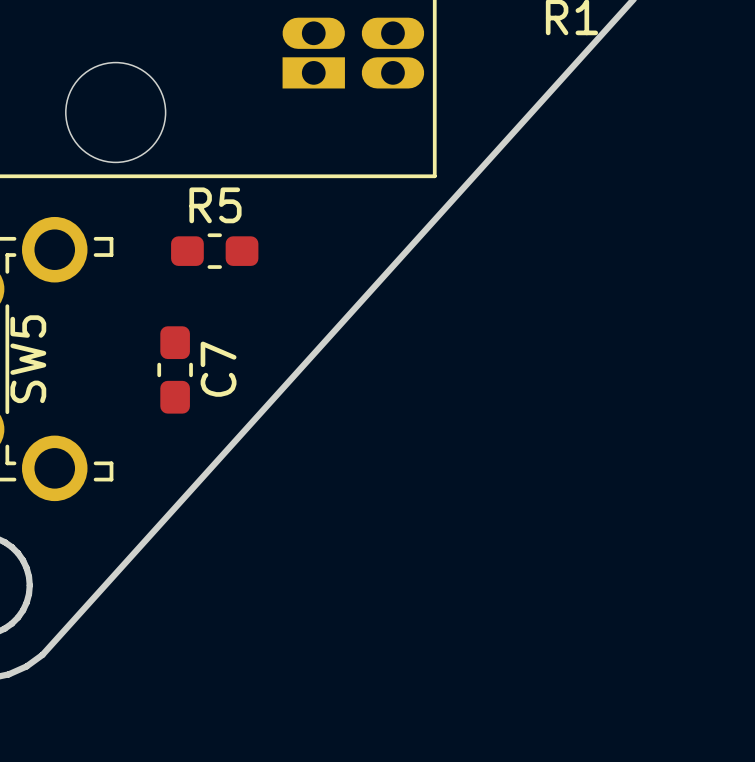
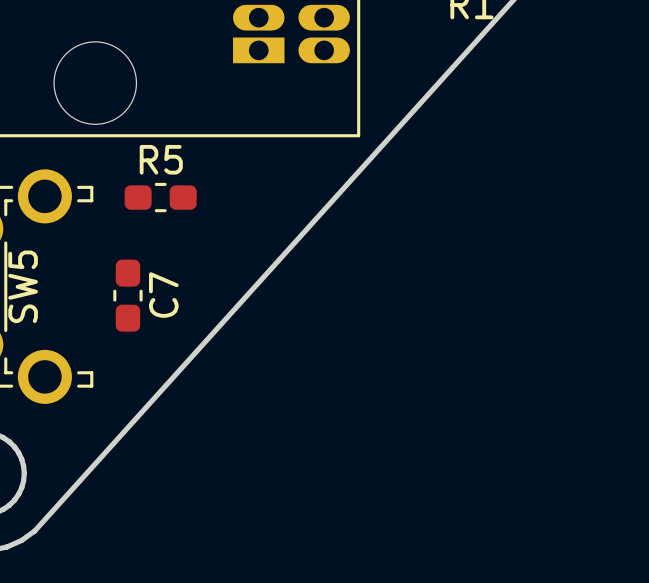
R5 position: (214, 251) -> (160, 197)
C7 position: (175, 369) -> (127, 295)

